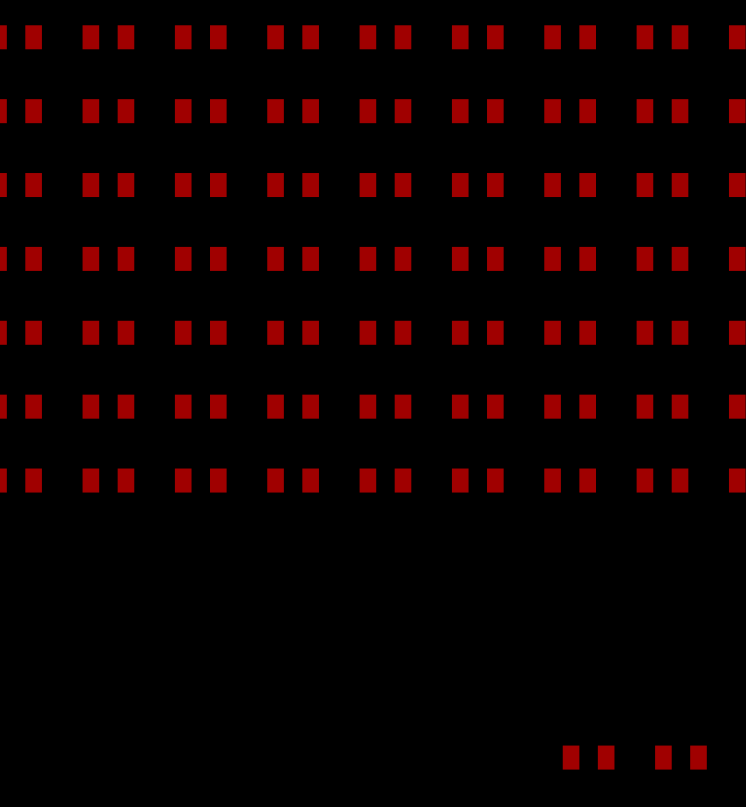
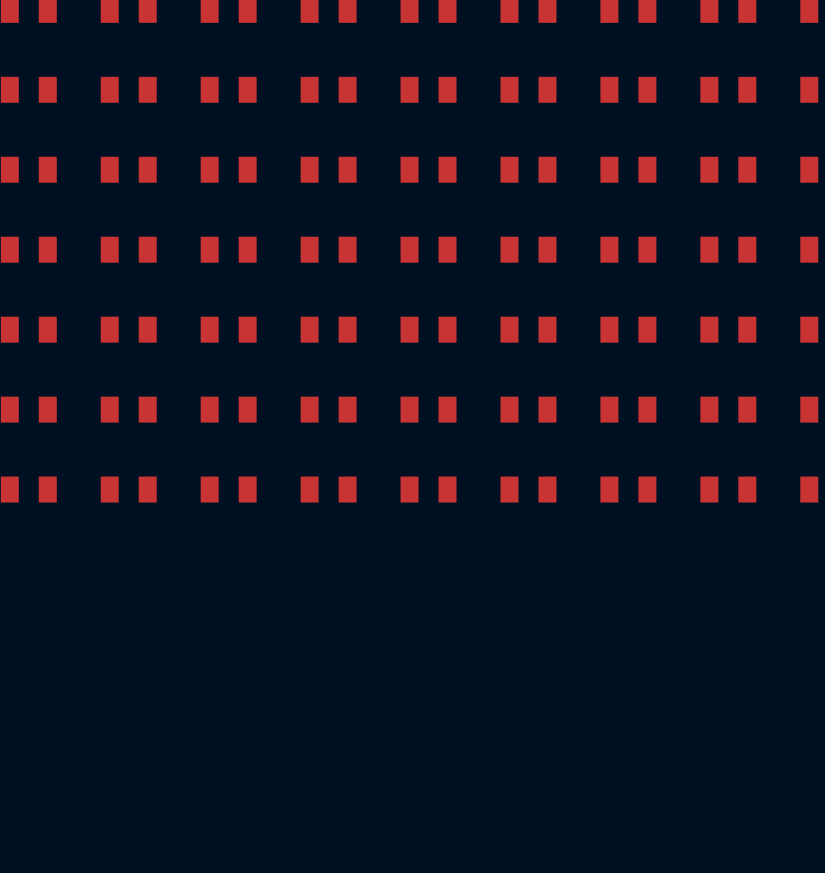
part: (588, 757) -> none
part: (680, 757) -> none

